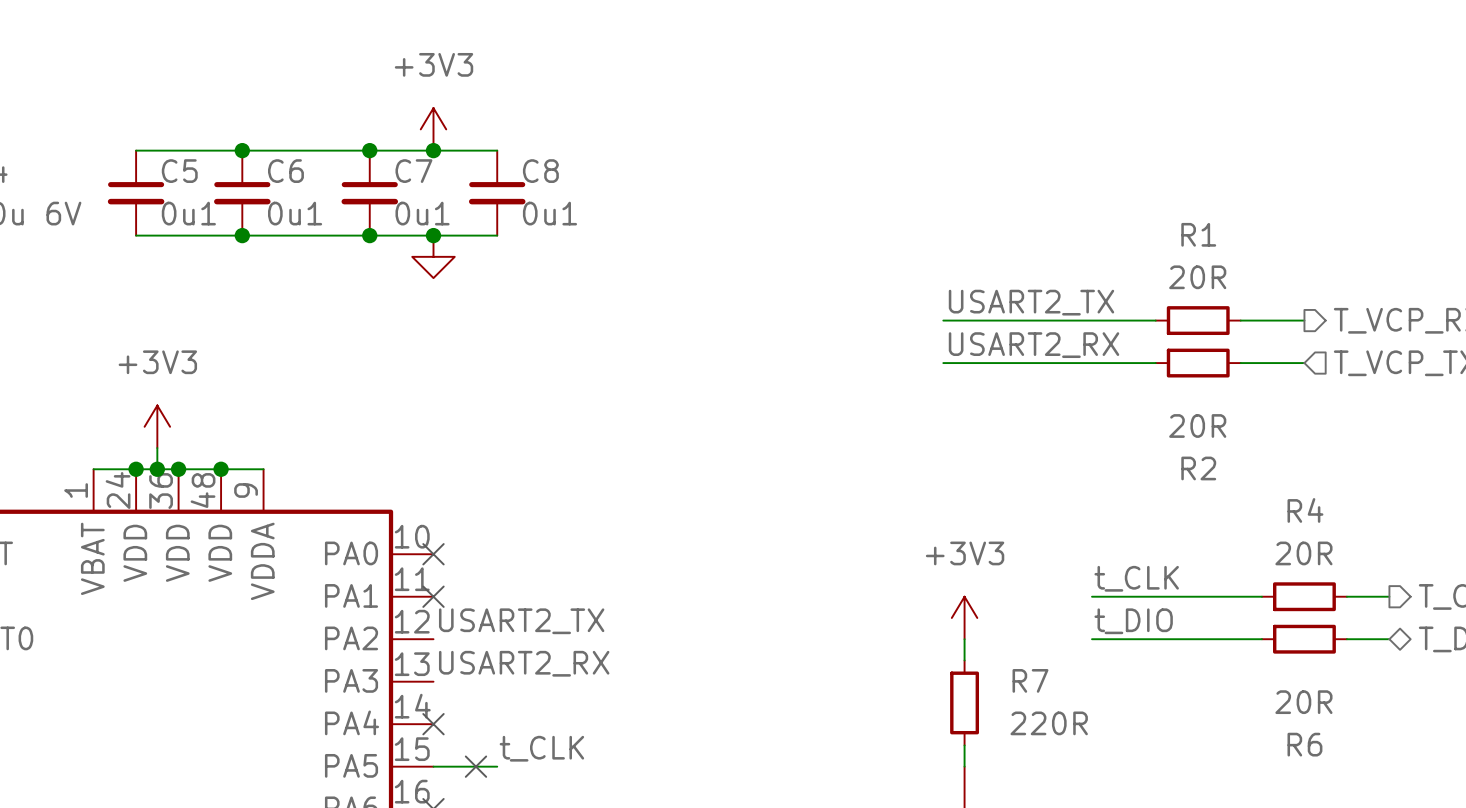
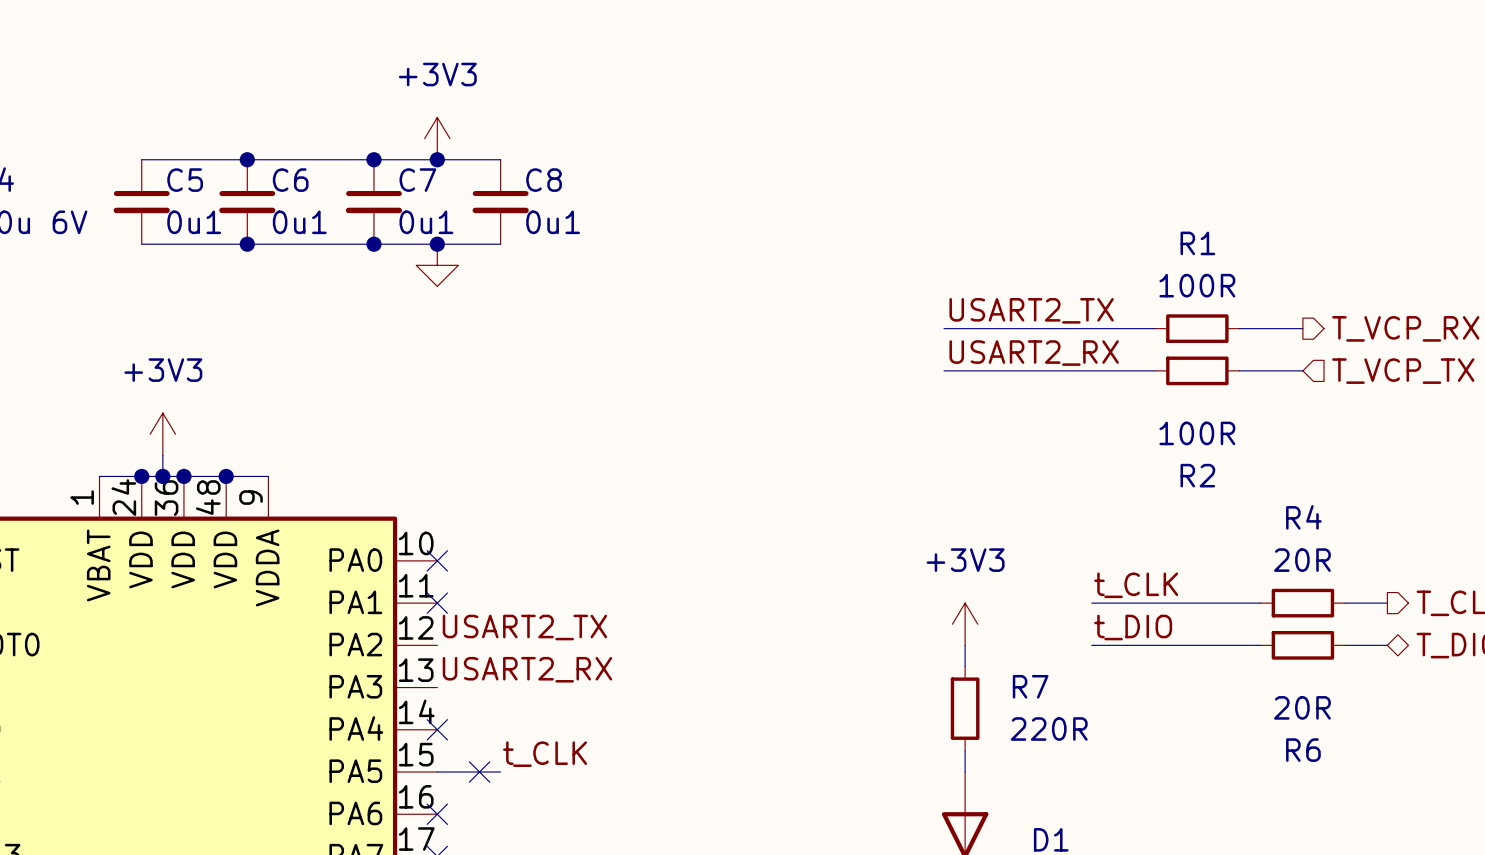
R1 value: 20R (1197, 277) -> 100R (1197, 285)
R2 value: 20R (1197, 425) -> 100R (1197, 433)

